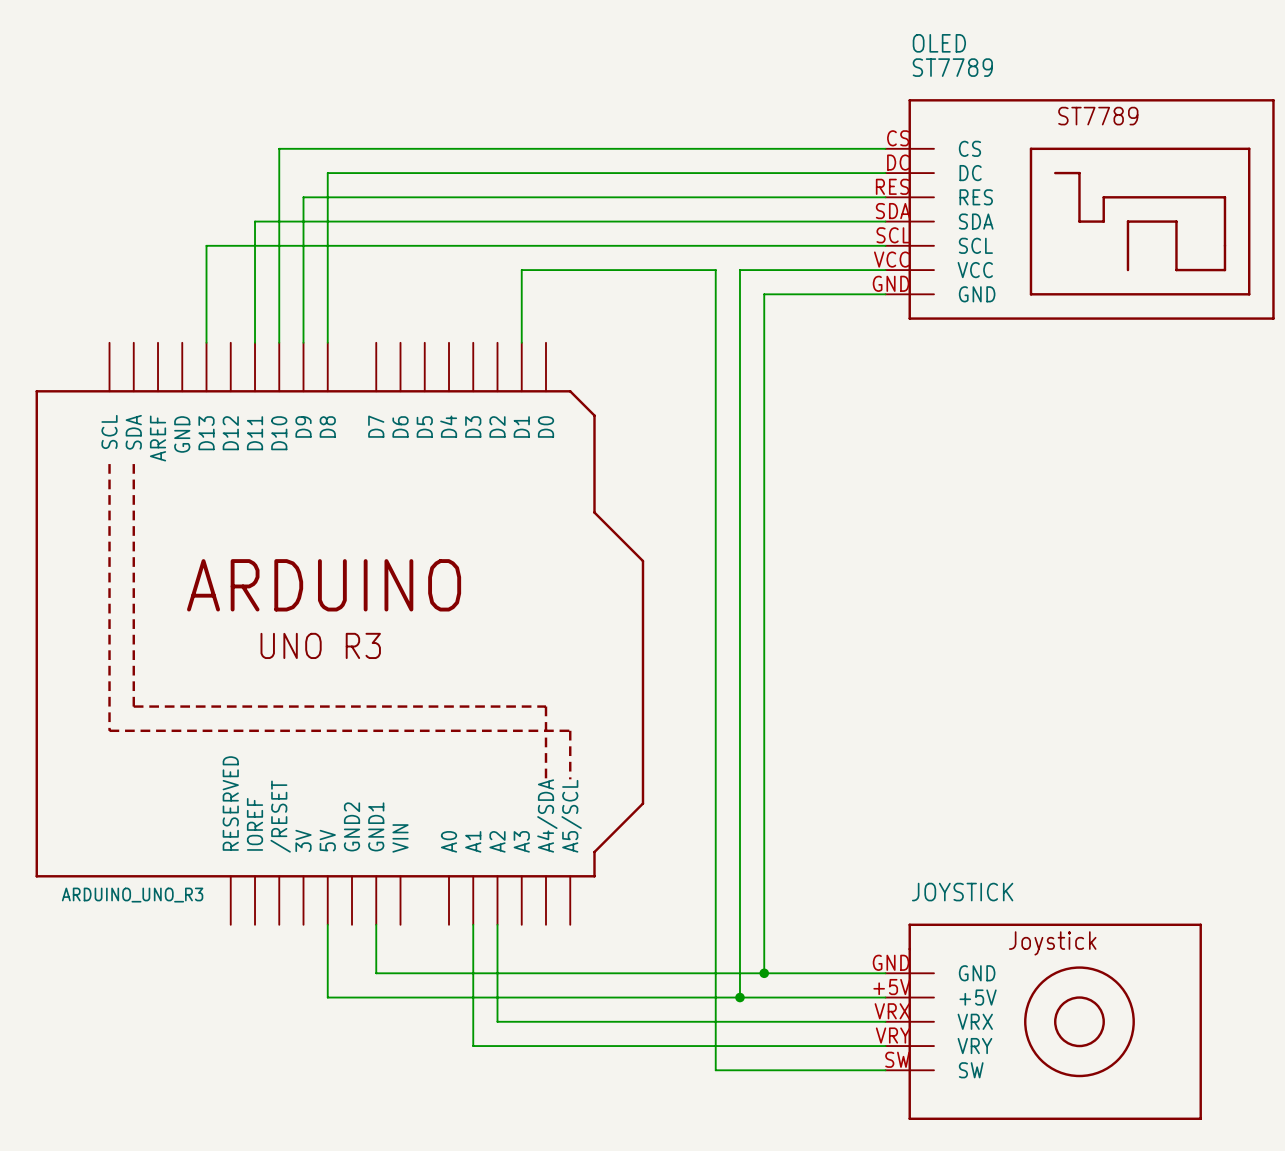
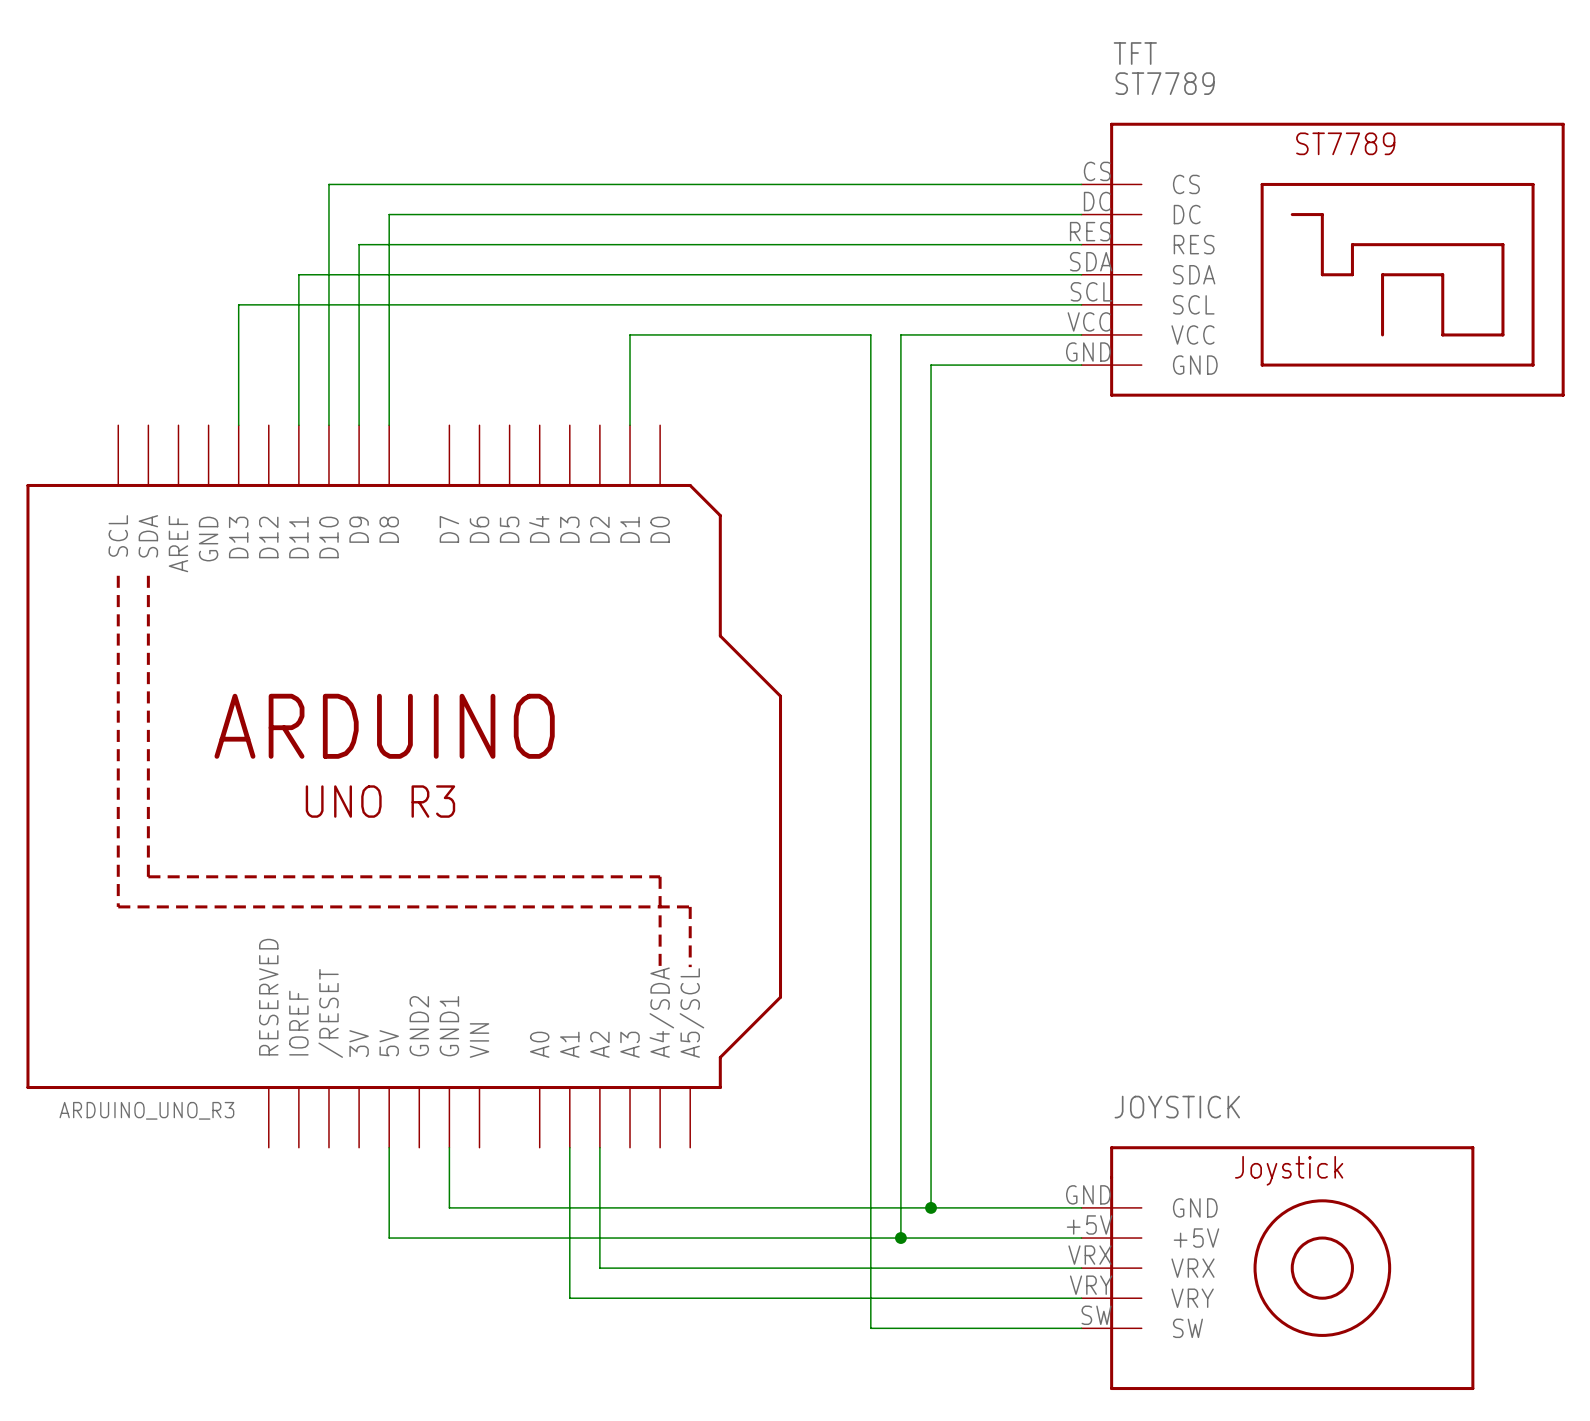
part symbol: [885, 99, 1275, 320] -> [1081, 122, 1565, 397]

